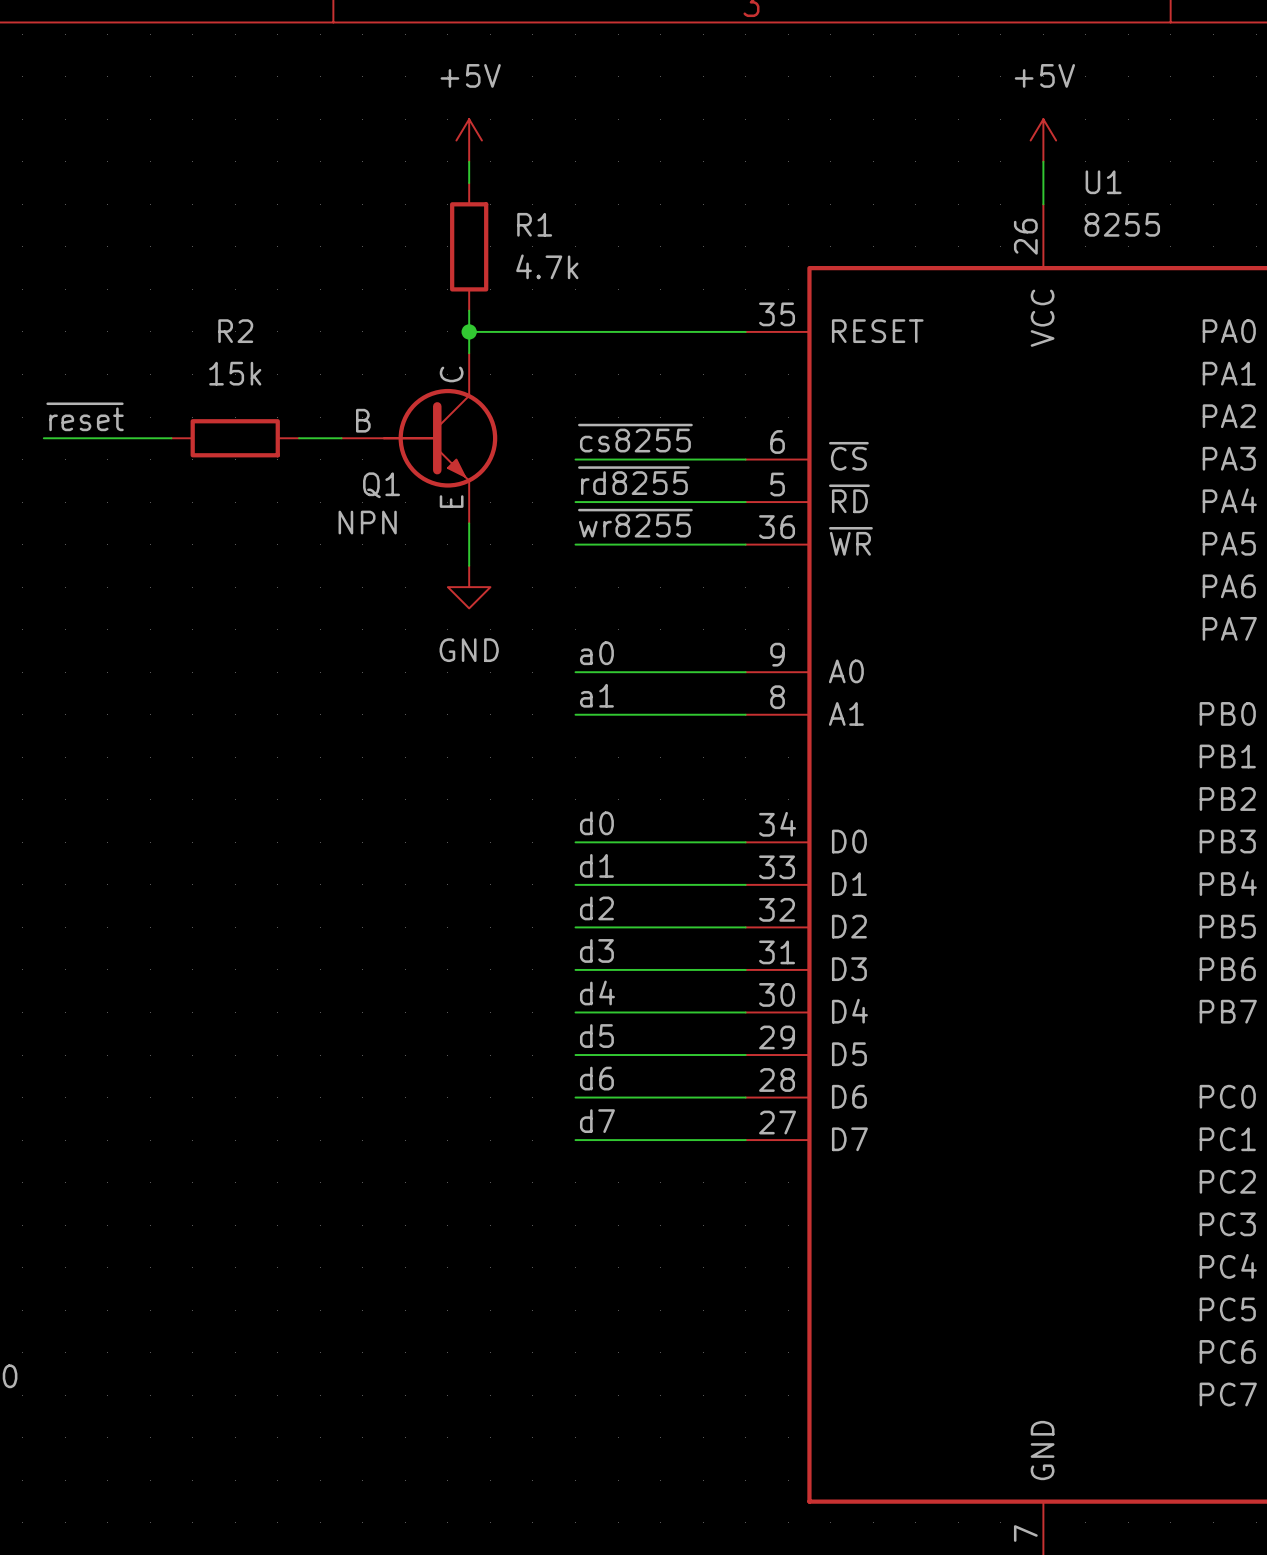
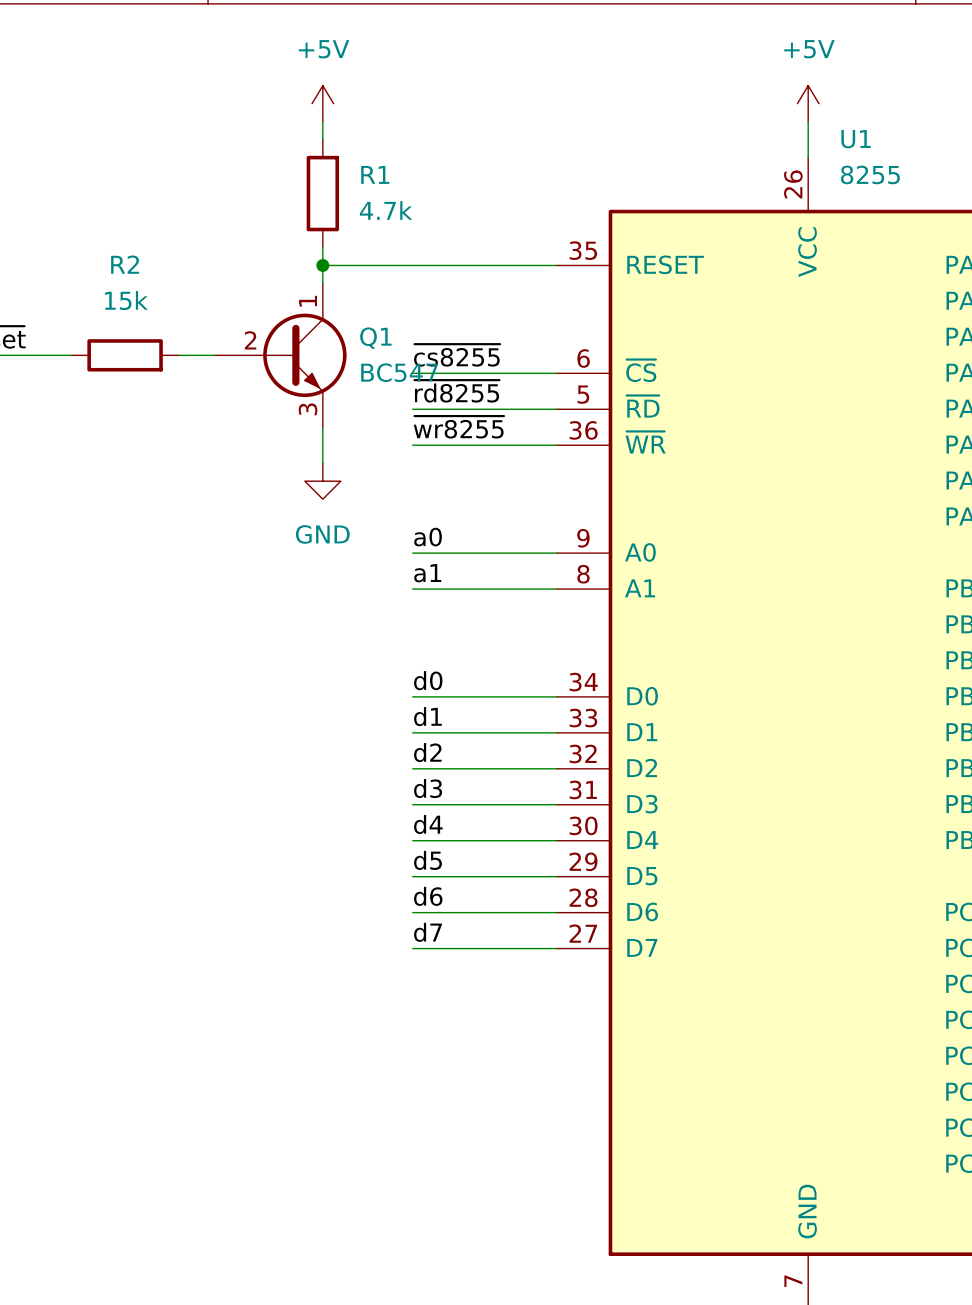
Q1 symbol: [341, 353, 498, 524] -> [214, 283, 347, 428]
Q1 name position: Q1 (381, 485) -> Q1 (375, 338)
Q1 value: NPN (367, 522) -> BC547 (399, 372)

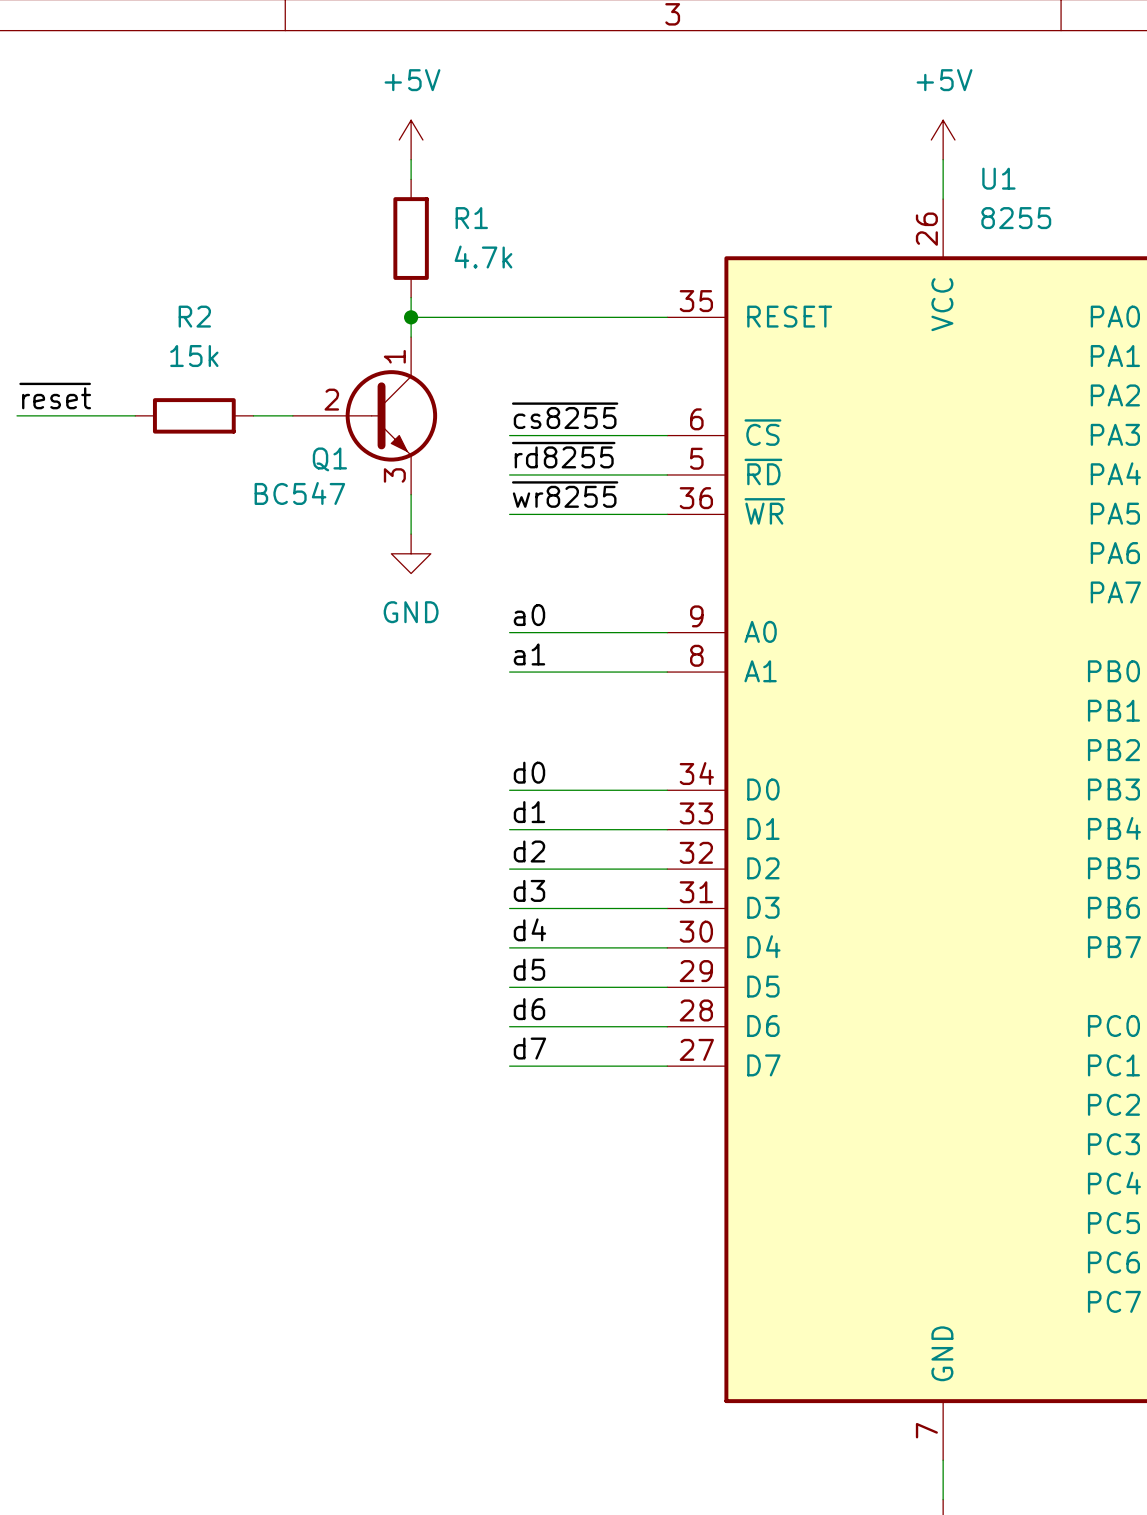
Q1 name position: Q1 (375, 338) -> Q1 (329, 459)
Q1 value position: BC547 (399, 372) -> BC547 (299, 493)

